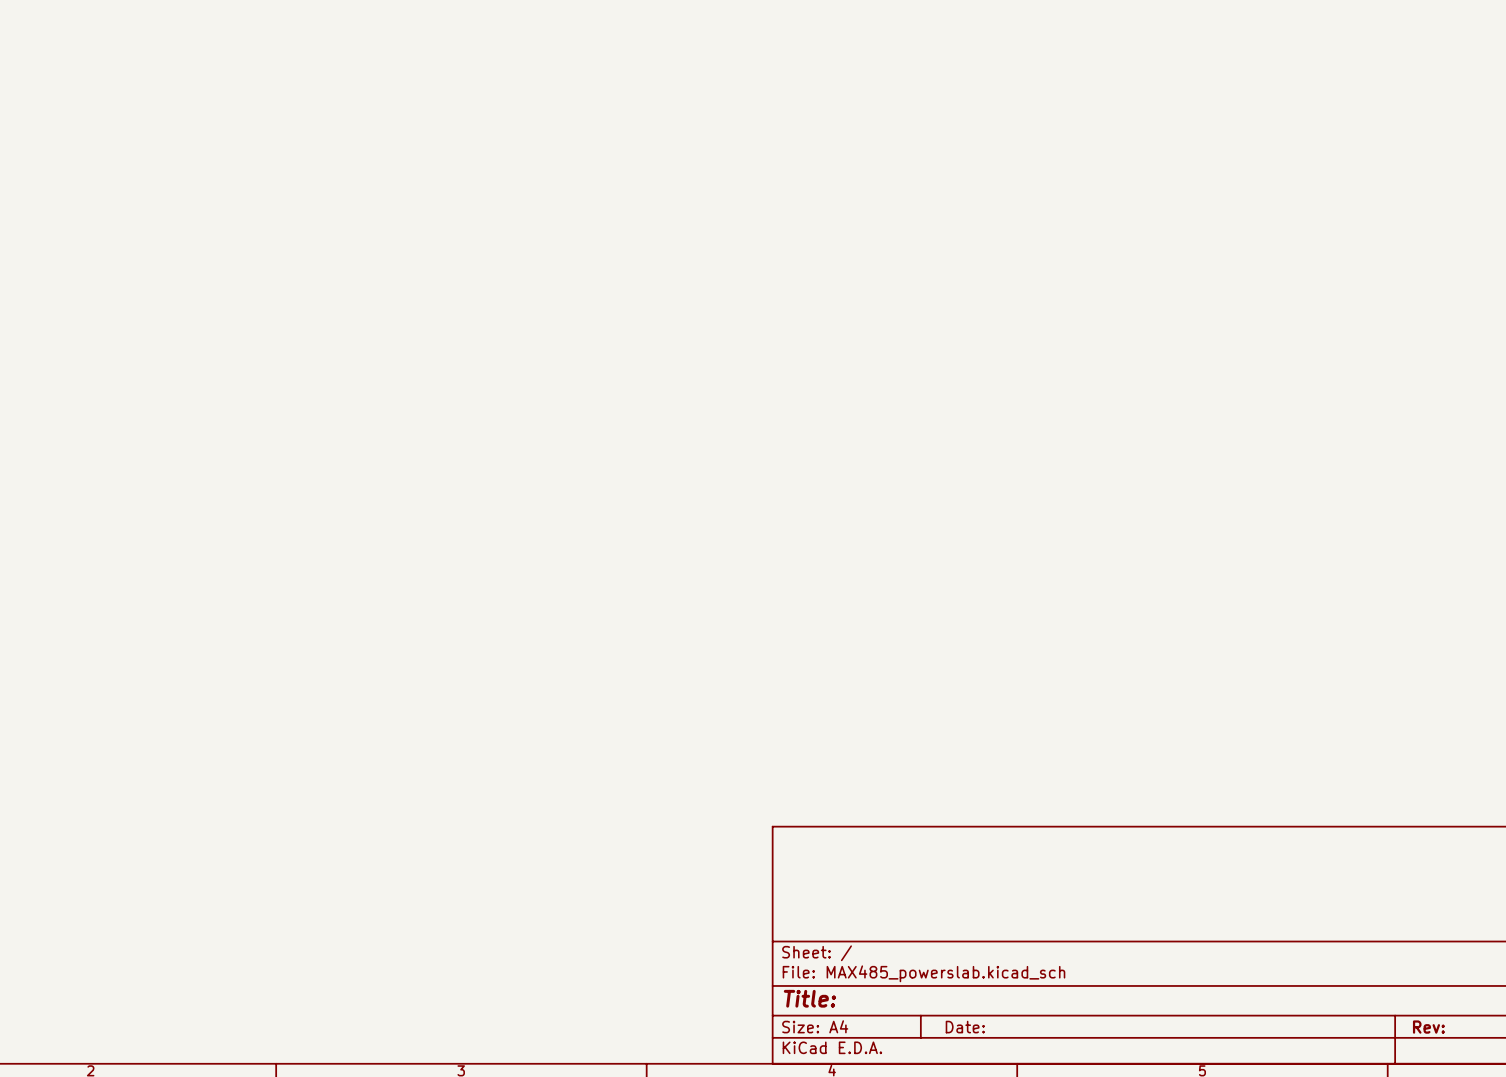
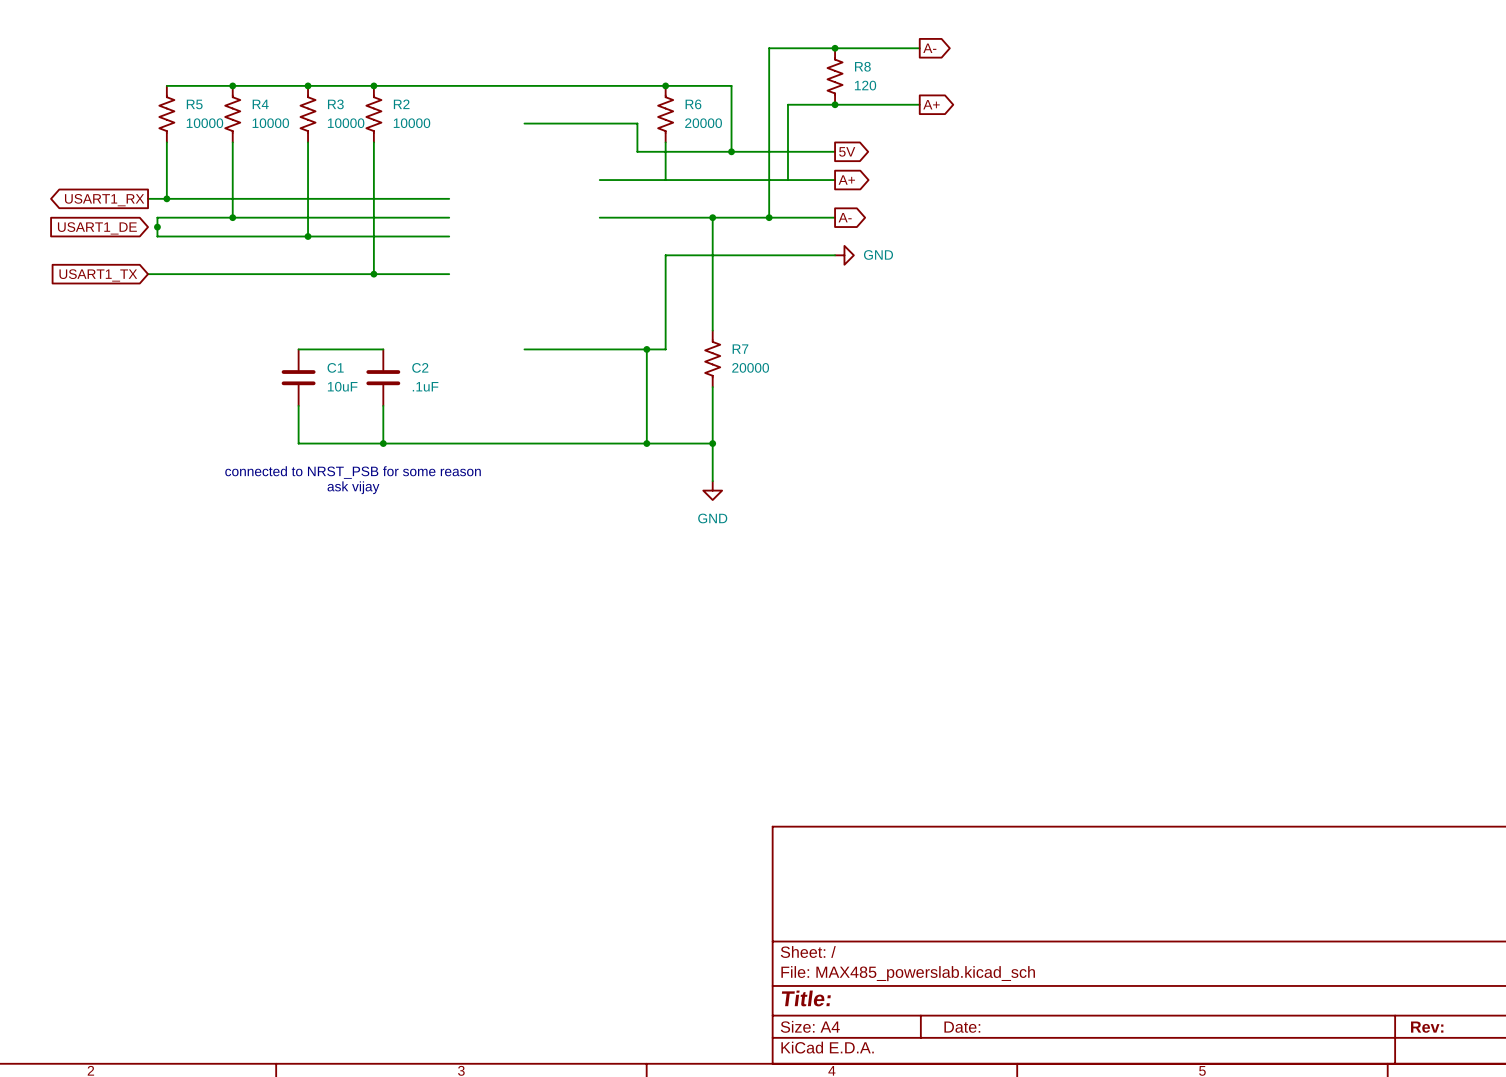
junction: none -> (835, 48)
wire: none -> (919, 48) (769, 48) (769, 217)
global label: none -> A- (929, 48)
R8: none -> 120 (835, 76)
wire: none -> (166, 85) (731, 85) (731, 151)
junction: none -> (232, 85)
junction: none -> (308, 85)
junction: none -> (373, 85)
junction: none -> (665, 85)
junction: none -> (835, 104)
wire: none -> (919, 104) (787, 104) (787, 180)
global label: none -> A+ (931, 104)
R5: none -> 10000 (166, 114)
R4: none -> 10000 (232, 114)
R3: none -> 10000 (308, 114)
R2: none -> 10000 (373, 114)
R6: none -> 20000 (665, 114)
wire: none -> (524, 123) (637, 123) (637, 151) (835, 151)
wire: none -> (166, 142) (166, 198)
wire: none -> (232, 142) (232, 217)
wire: none -> (308, 142) (308, 236)
wire: none -> (373, 142) (373, 274)
wire: none -> (665, 142) (665, 180)
junction: none -> (731, 151)
global label: none -> 5V (847, 151)
wire: none -> (599, 180) (835, 180)
global label: none -> A+ (846, 180)
wire: none -> (148, 198) (449, 198)
junction: none -> (166, 198)
global label: none -> USART1_RX (104, 200)
junction: none -> (232, 217)
wire: none -> (449, 217) (157, 217) (157, 236) (449, 236)
wire: none -> (599, 217) (835, 217)
wire: none -> (712, 217) (712, 330)
junction: none -> (712, 217)
junction: none -> (769, 217)
global label: none -> A- (845, 217)
global label: none -> USART1_DE (97, 228)
junction: none -> (157, 227)
junction: none -> (308, 236)
wire: none -> (835, 255) (665, 255) (665, 349) (524, 349)
power symbol: none -> GND (844, 255)
global label: none -> USART1_TX (98, 275)
wire: none -> (148, 274) (449, 274)
junction: none -> (373, 274)
wire: none -> (298, 349) (383, 349)
wire: none -> (646, 349) (646, 443)
junction: none -> (646, 349)
R7: none -> 20000 (712, 358)
C1: none -> 10uF (298, 377)
C2: none -> .1uF (383, 377)
wire: none -> (712, 387) (712, 481)
wire: none -> (298, 405) (298, 443) (712, 443)
wire: none -> (383, 405) (383, 443)
junction: none -> (383, 443)
junction: none -> (646, 443)
junction: none -> (712, 443)
text: none -> connected to NRST_PSB for some reason (353, 472)
text: none -> ask vijay (353, 487)
power symbol: none -> GND (712, 490)

